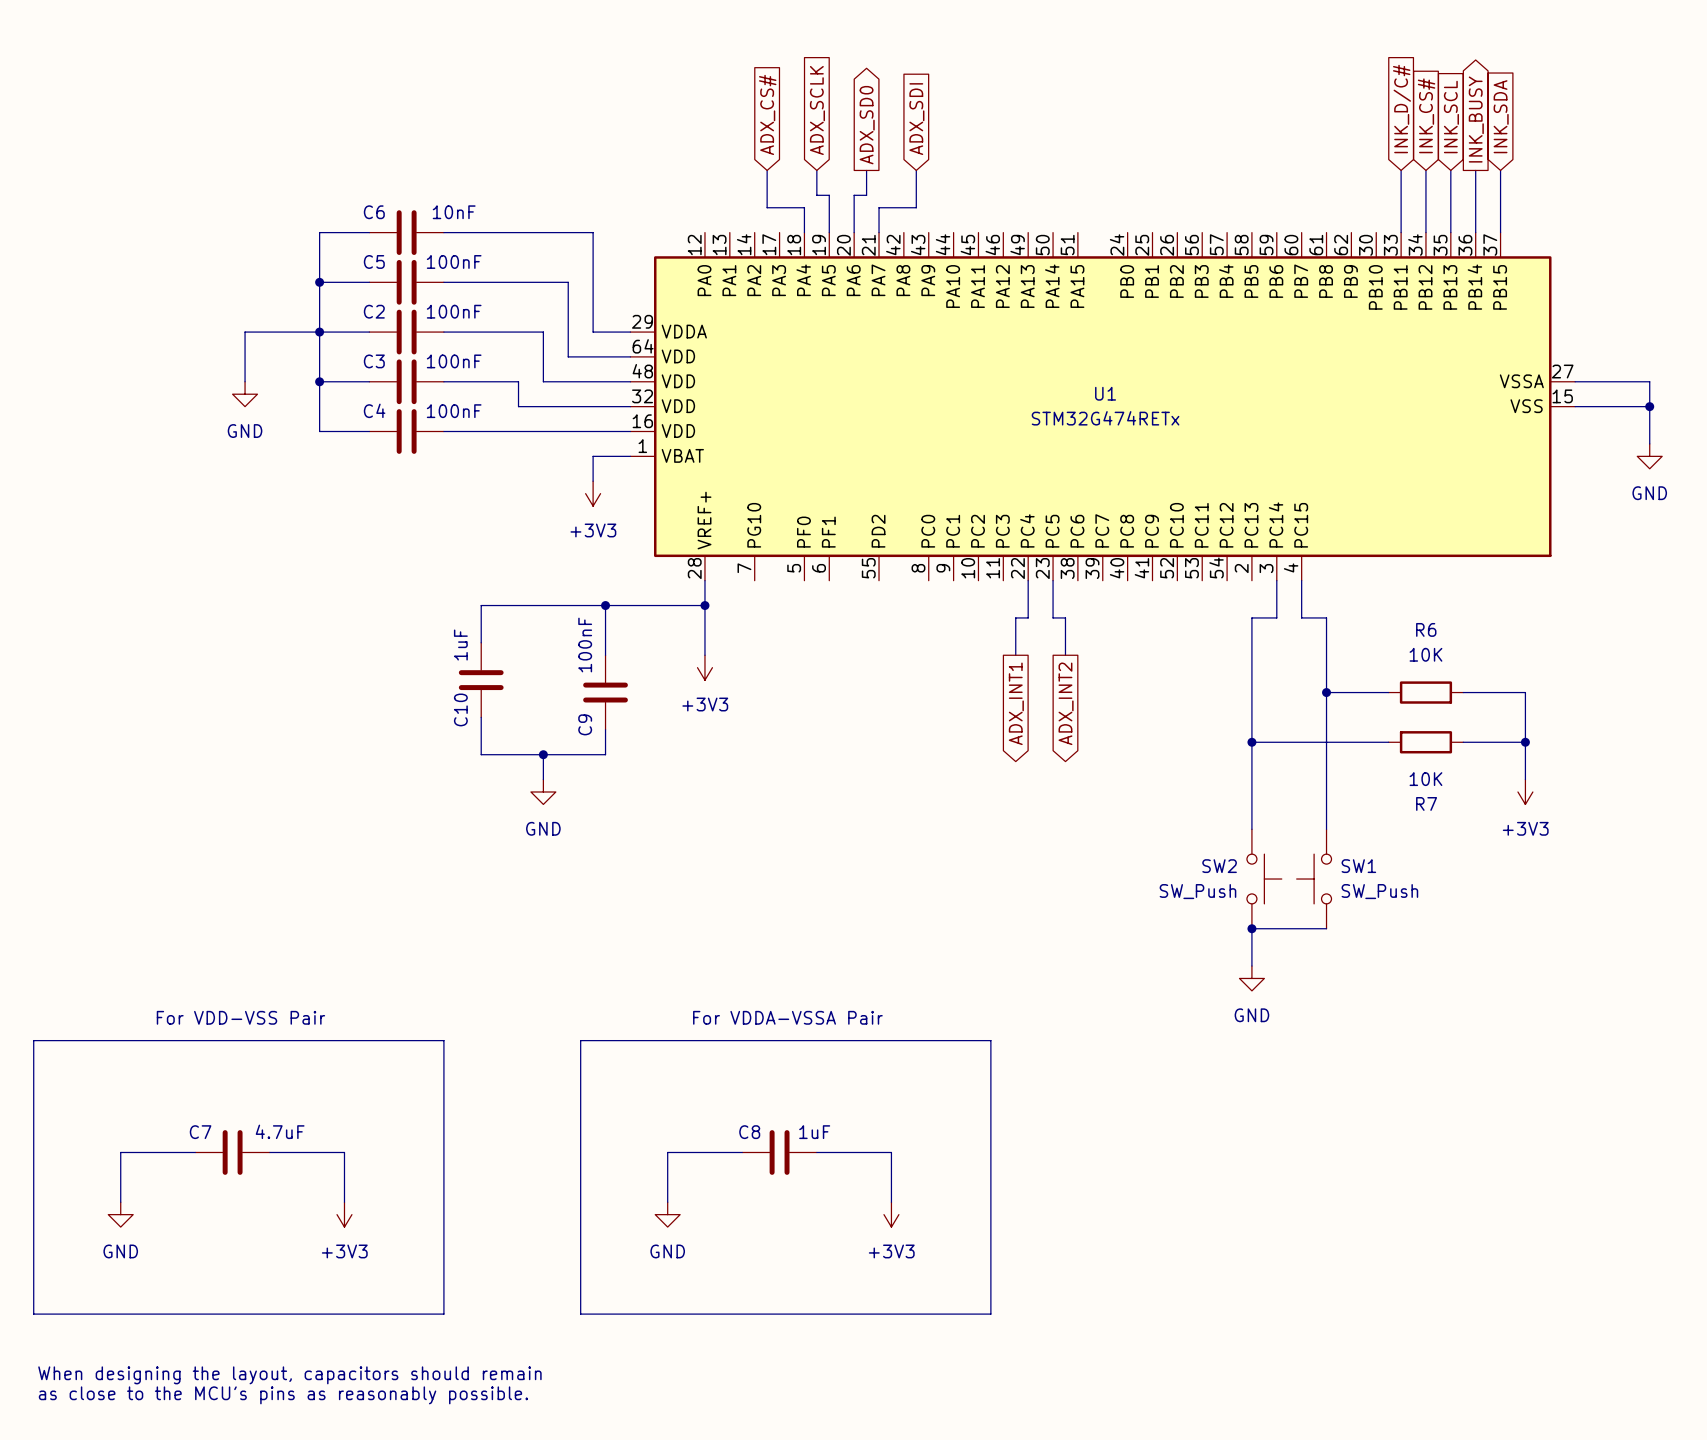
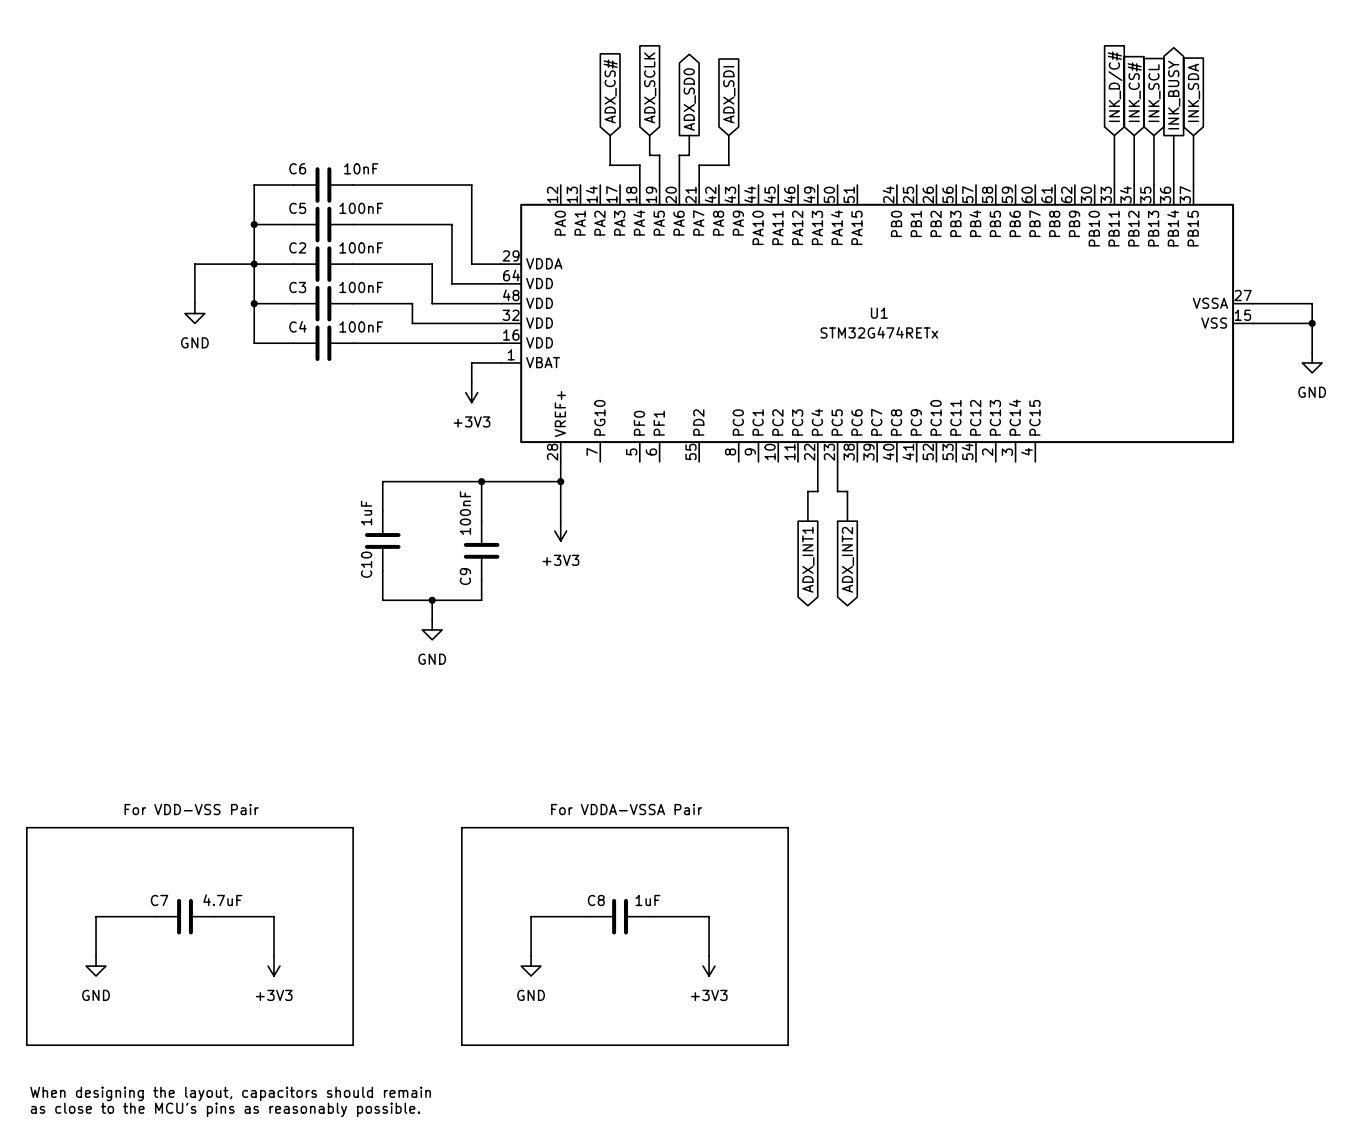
wire: (1276, 580) (1276, 617) (1251, 617) (1251, 829) -> none
wire: (1301, 580) (1301, 617) (1326, 617) (1326, 829) -> none
wire: (1326, 692) (1388, 692) -> none
junction: (1326, 692) -> none
R6: 10K (1425, 692) -> none
wire: (1463, 692) (1525, 692) (1525, 779) -> none
wire: (1251, 742) (1388, 742) -> none
junction: (1251, 742) -> none
R7: 10K (1425, 742) -> none
wire: (1463, 742) (1525, 742) -> none
junction: (1525, 742) -> none
power symbol: +3V3 (1525, 791) -> none
SW2: SW_Push (1264, 879) -> none
SW1: SW_Push (1314, 879) -> none
junction: (1251, 928) -> none
wire: (1326, 928) (1251, 928) (1251, 966) -> none
power symbol: GND (1251, 978) -> none

